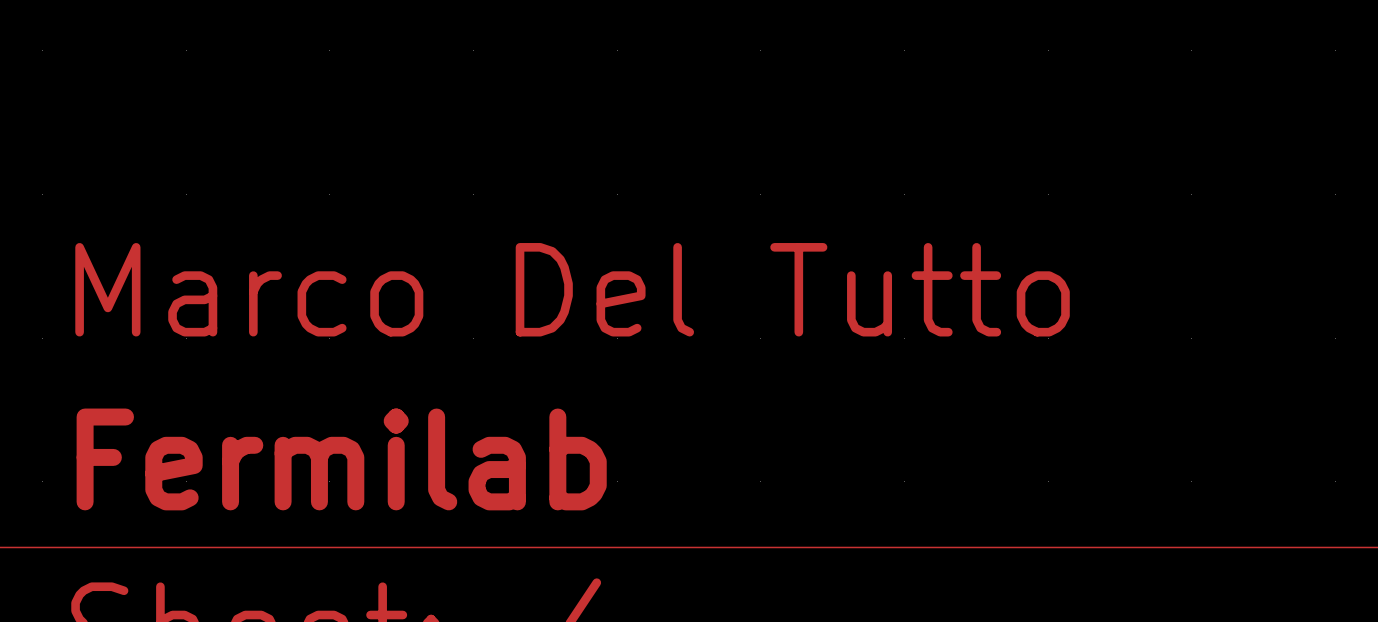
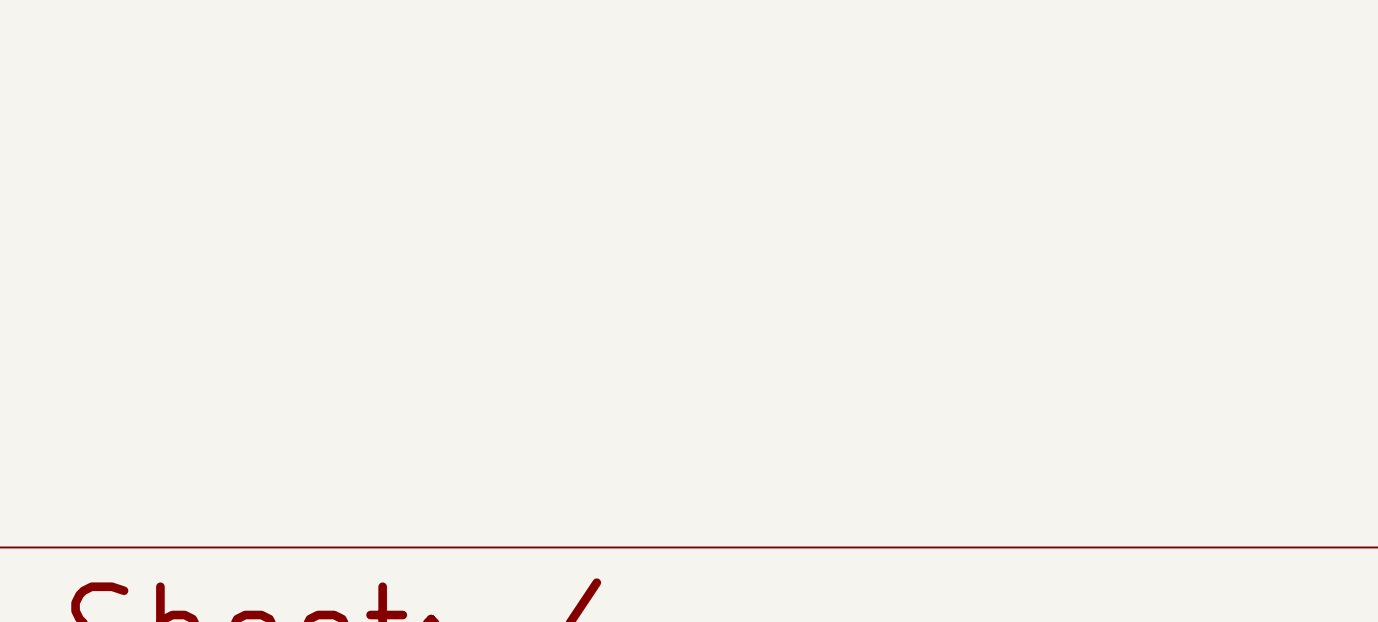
title block: Marco Del Tutto (572, 289) -> none
title block: Fermilab (341, 459) -> none

